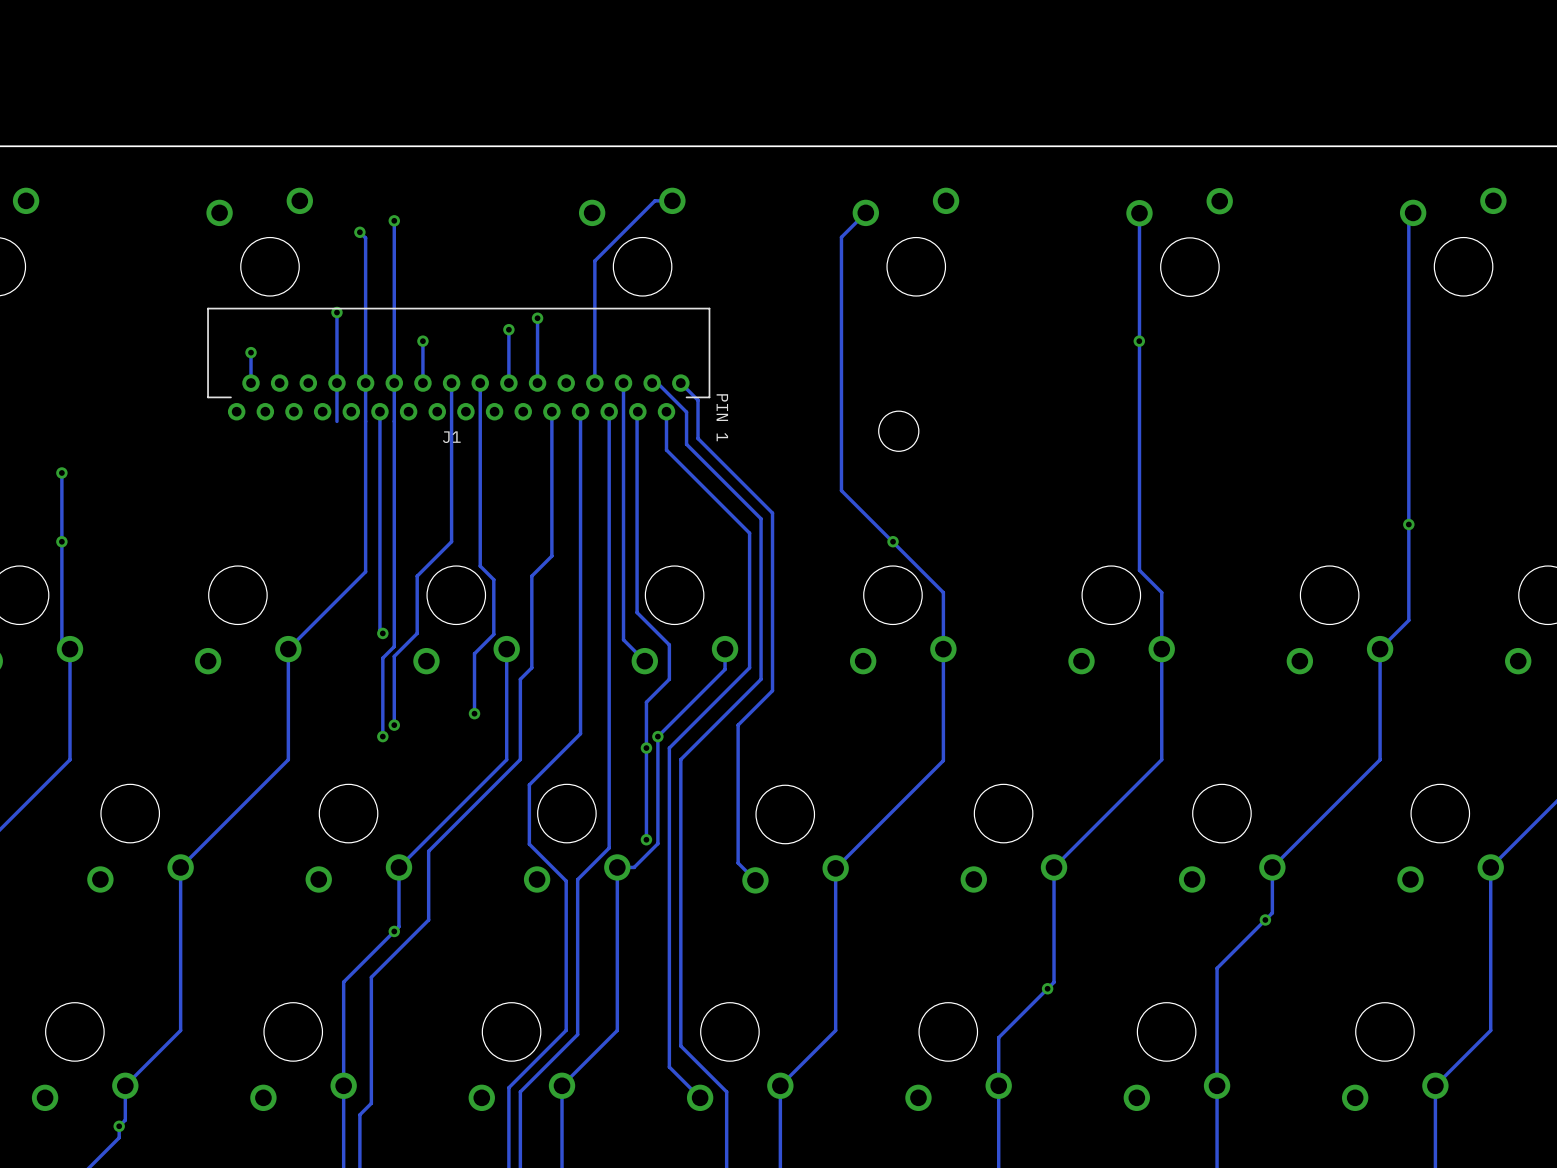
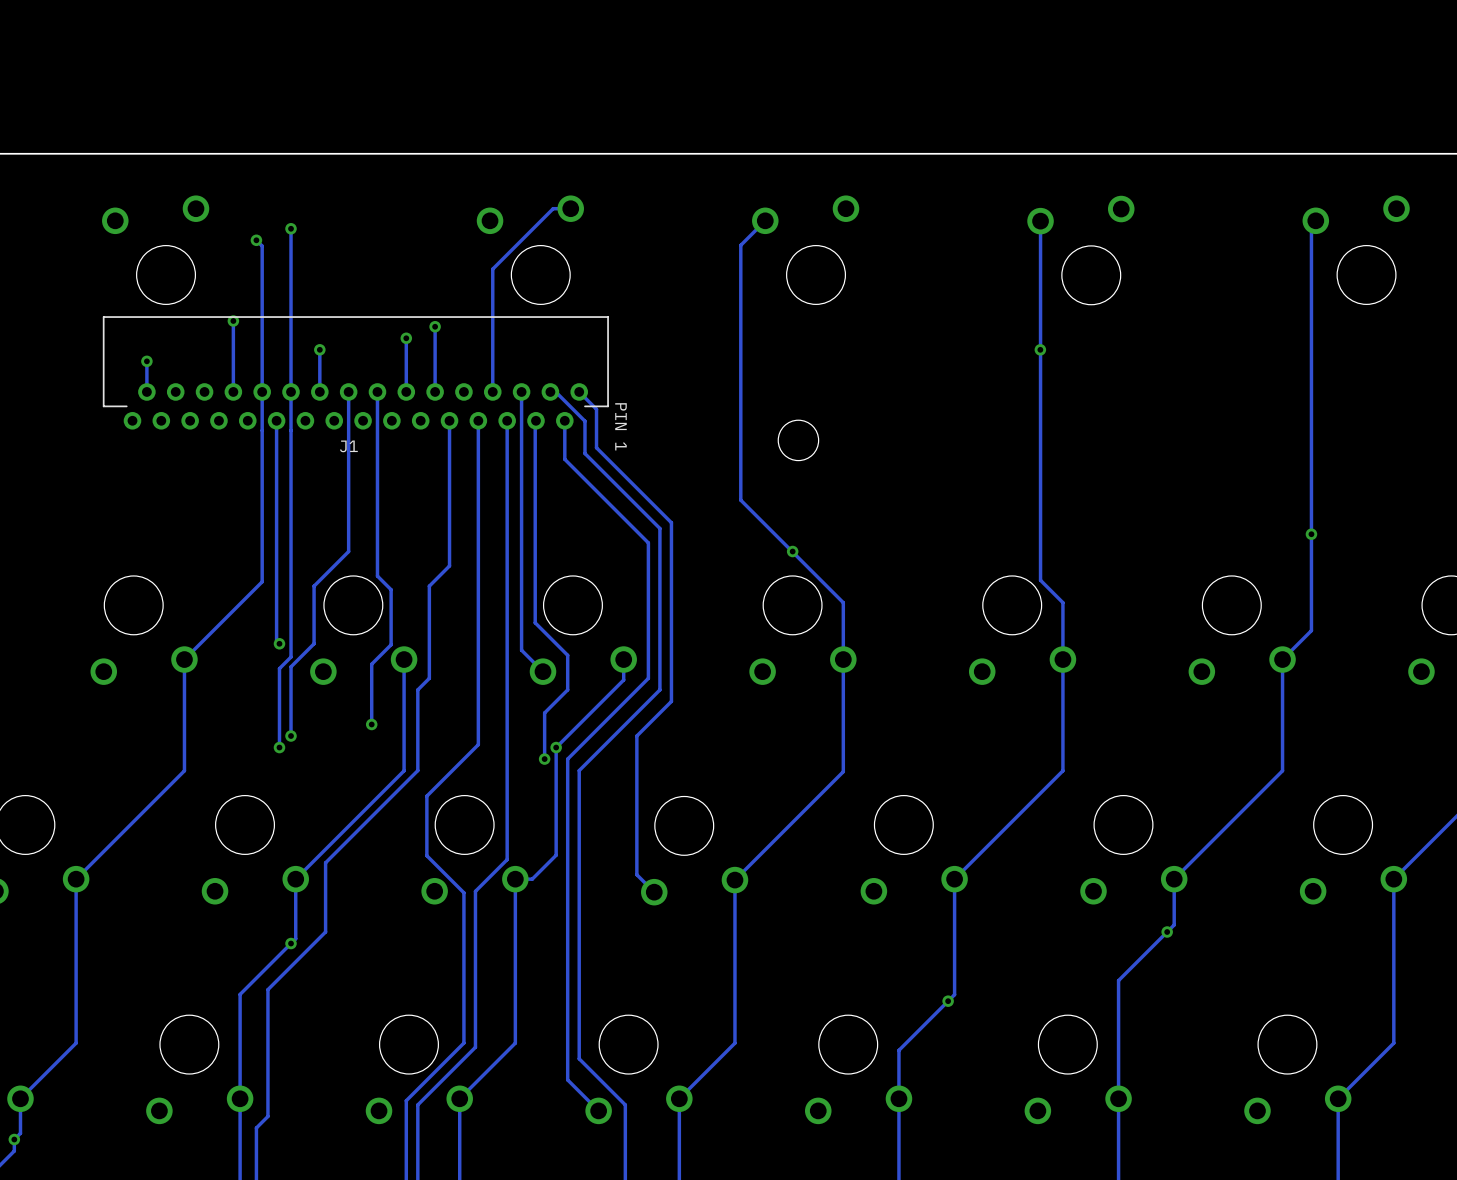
track: (336, 383) (336, 421) -> none
track: (646, 748) (646, 839) -> none
via: (646, 839) -> none

